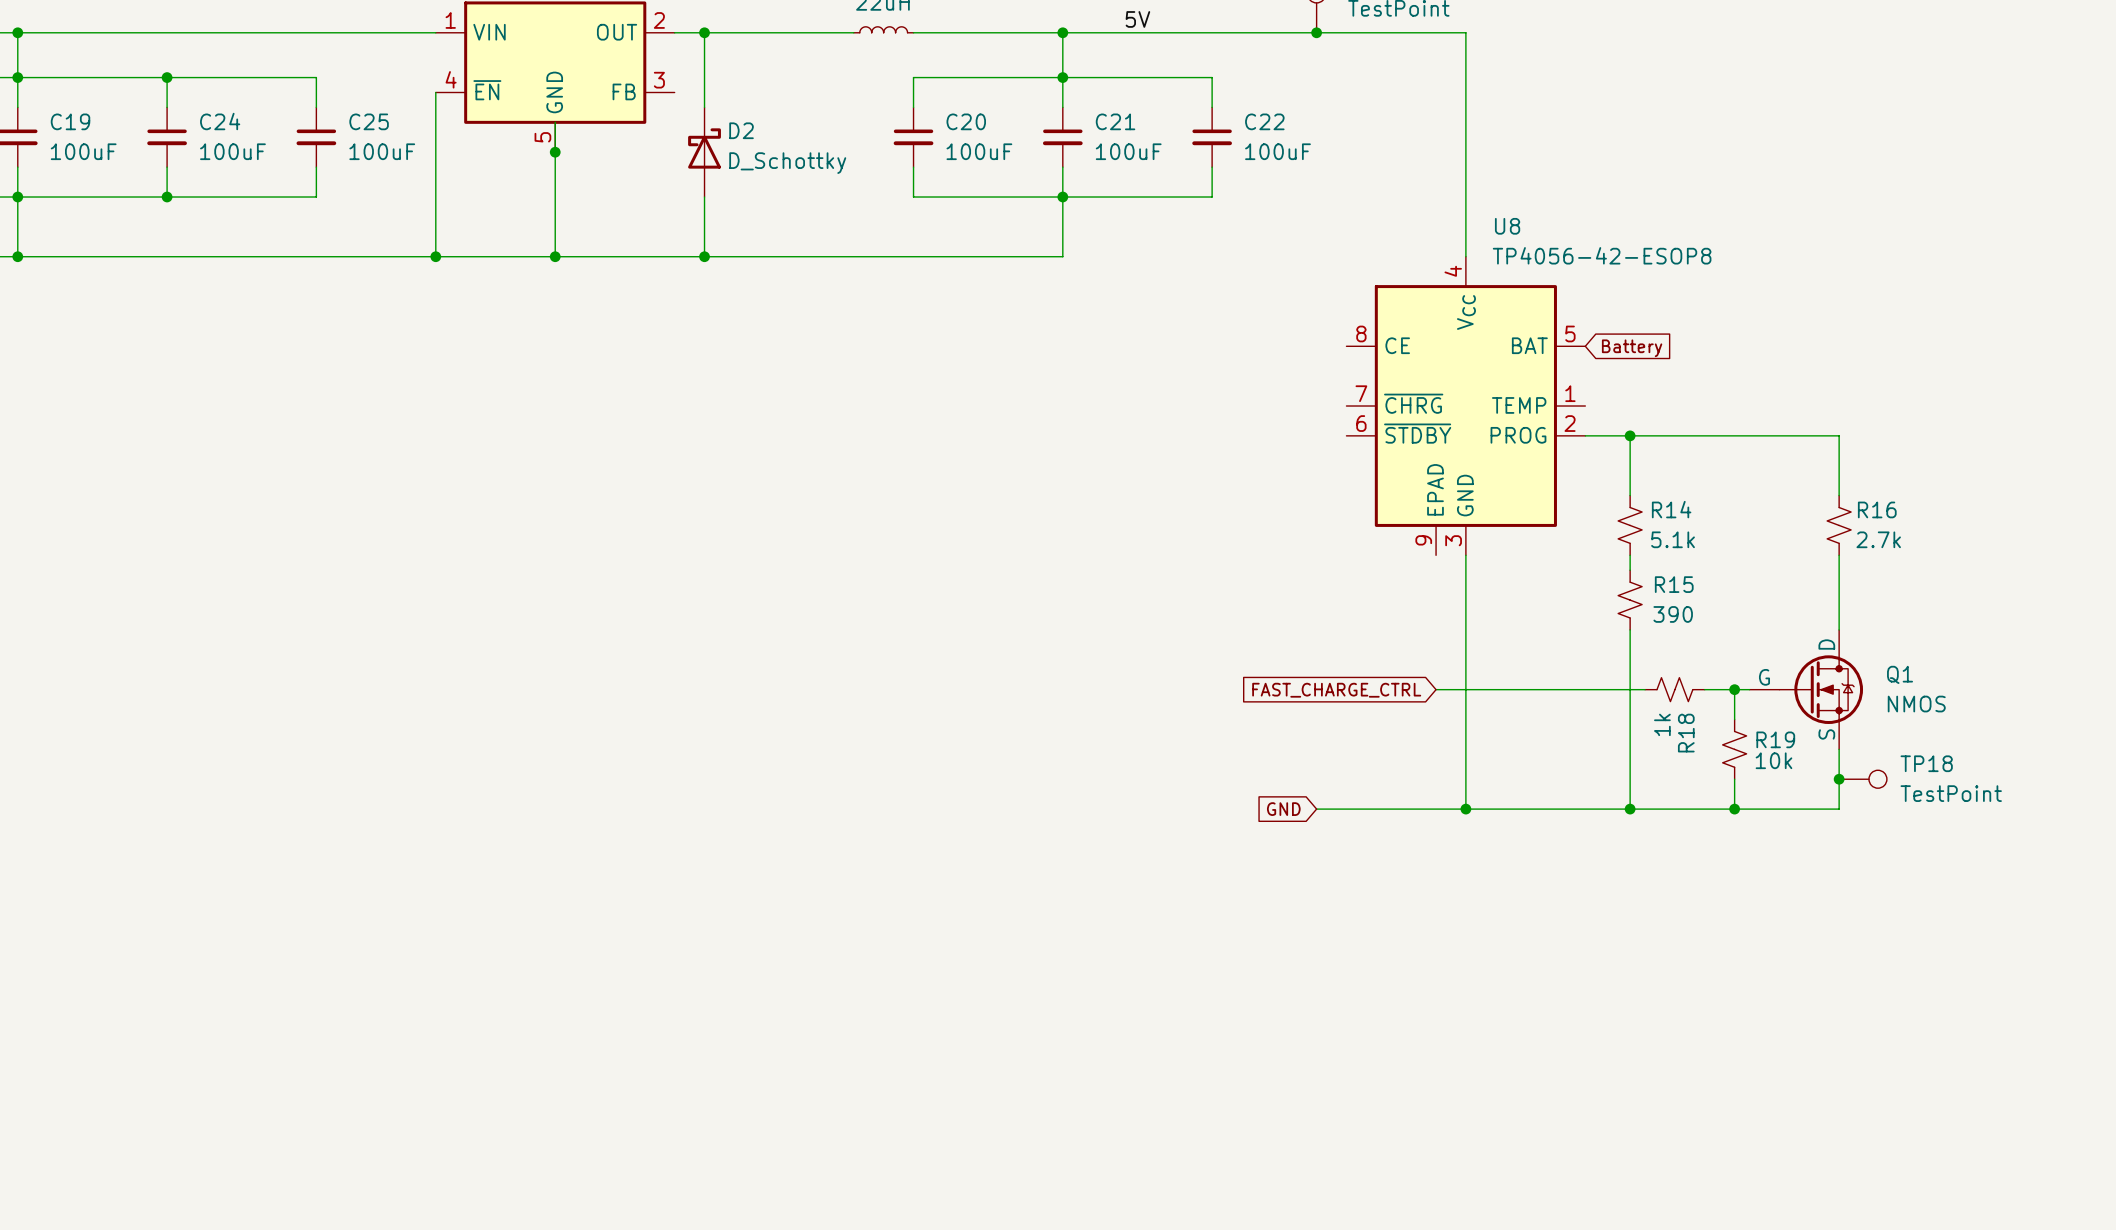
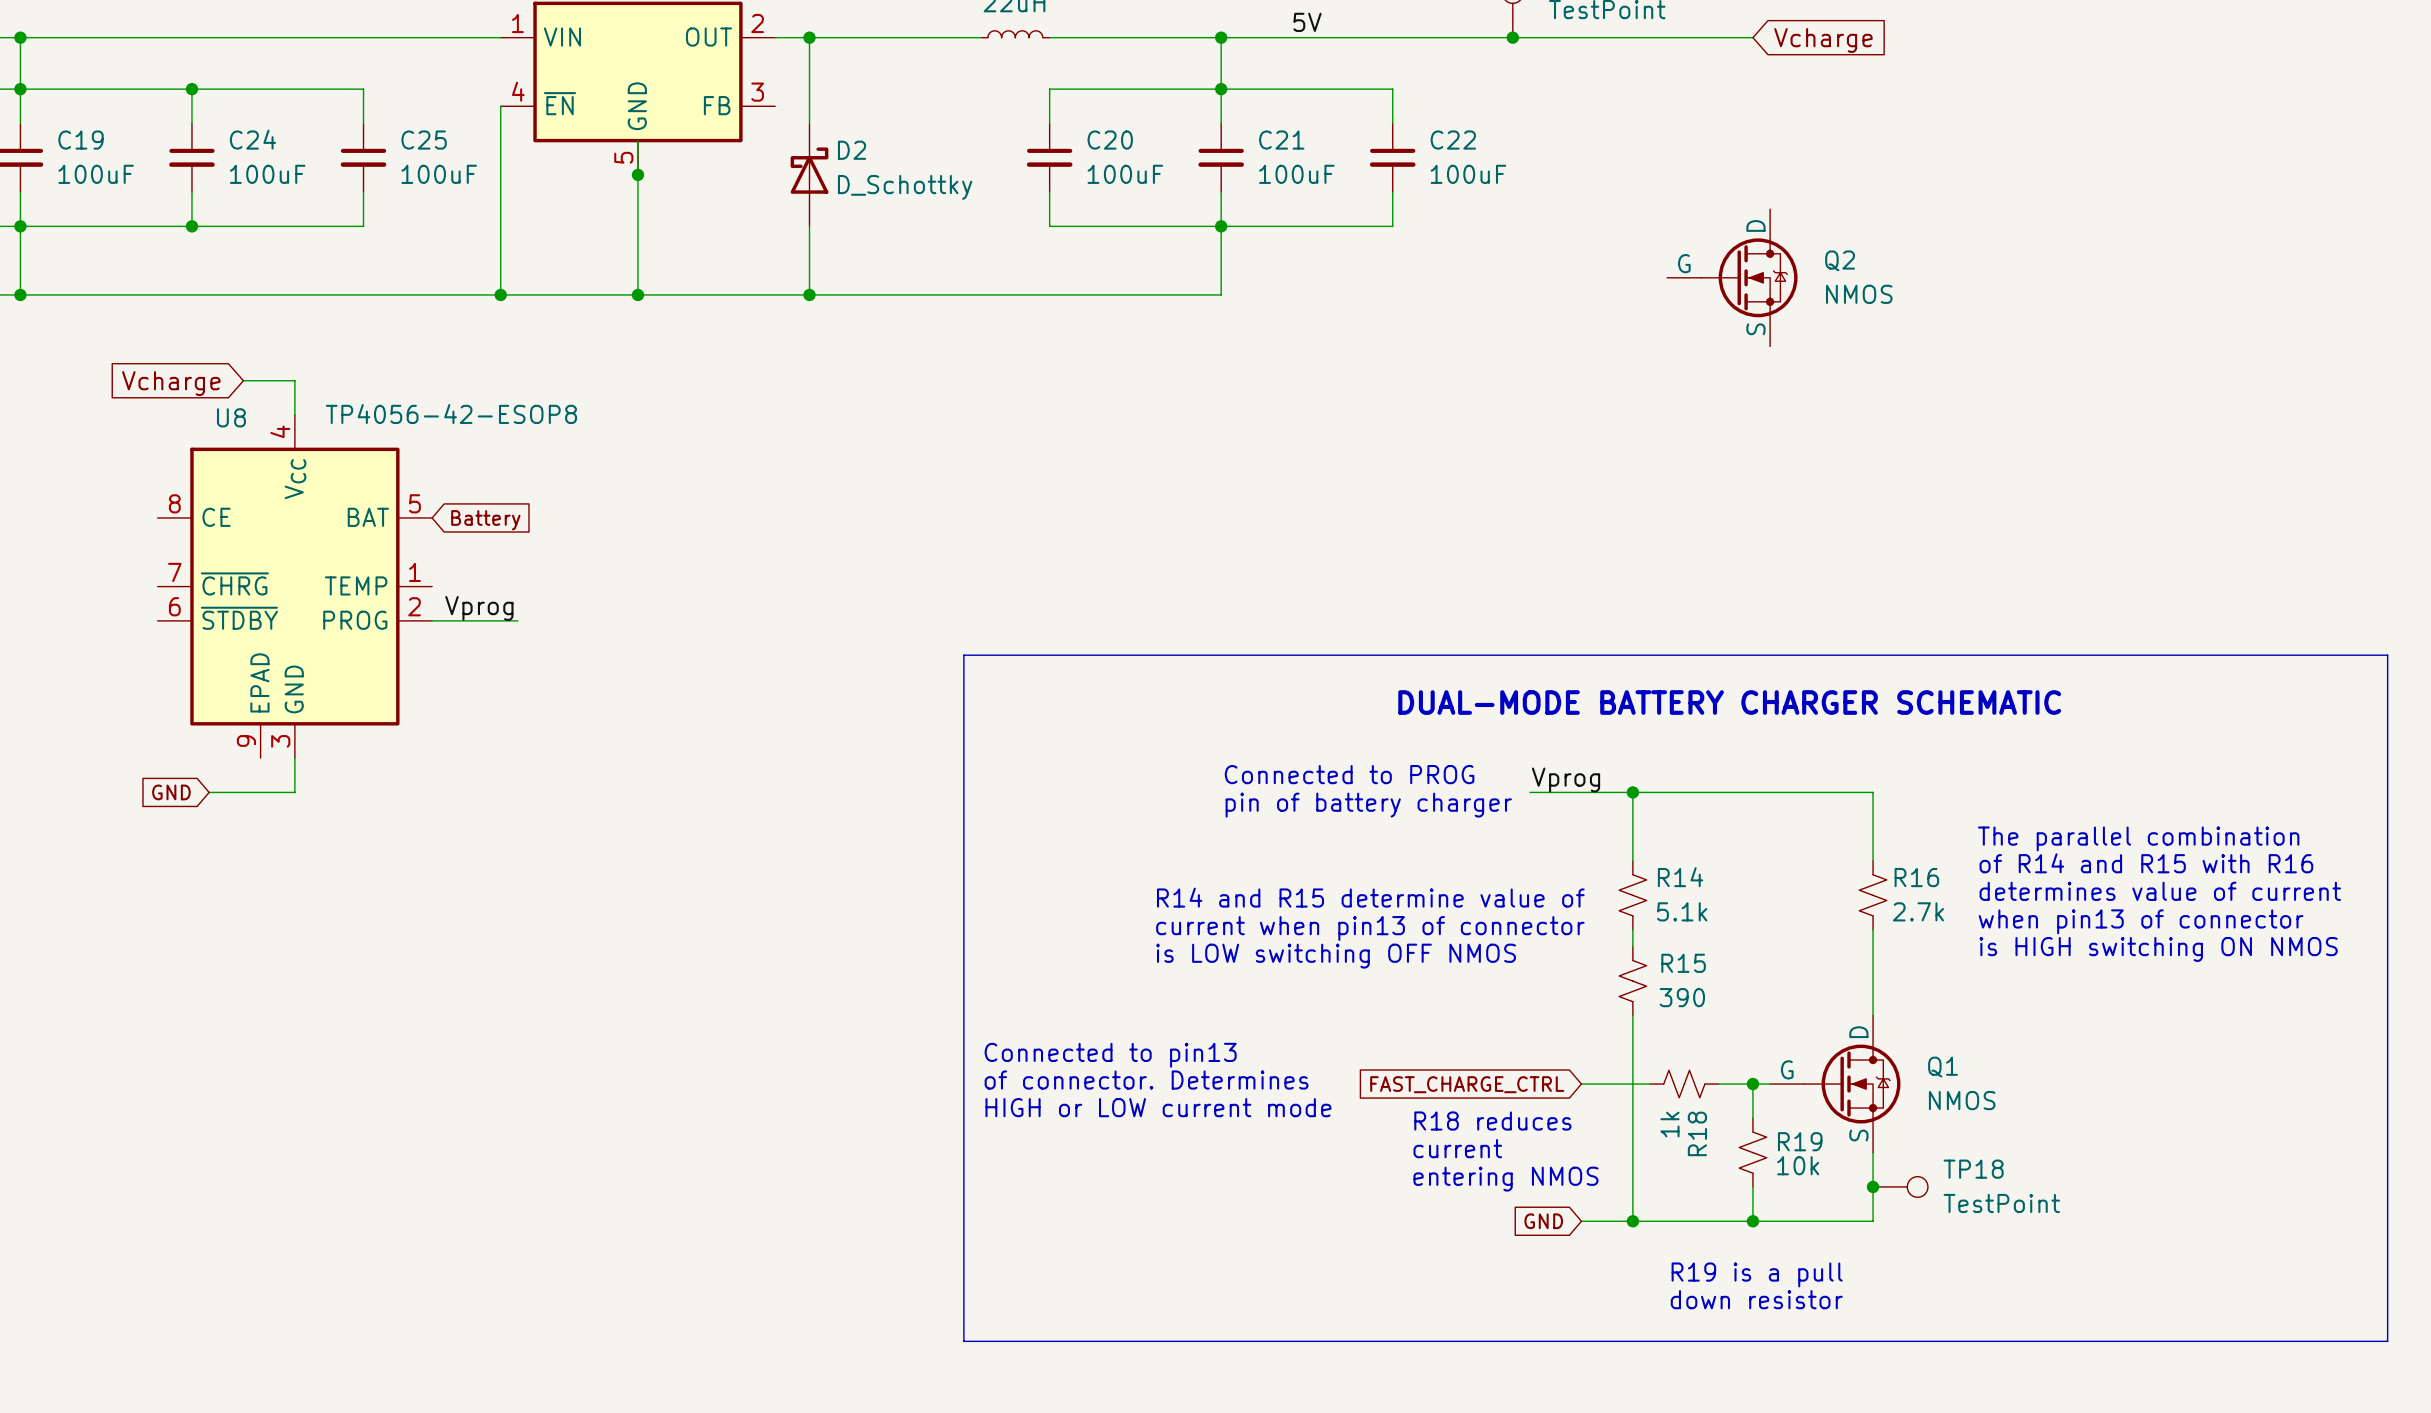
wire: (1465, 32) (1465, 256) -> (1684, 37) (1752, 37)
global label: none -> Vcharge (1823, 40)
U8 name position: U8 (1507, 226) -> U8 (231, 417)
Q2: none -> NMOS (1732, 277)
wire: none -> (243, 380) (294, 380) (294, 415)
global label: none -> Vcharge (171, 383)
global label: Battery (1632, 348) -> none
U8 position: (1465, 406) -> (294, 586)
wire: (1585, 435) (1839, 435) (1839, 495) -> none
wire: (1630, 435) (1630, 495) -> none
junction: (1630, 435) -> none
global label: none -> Battery (485, 520)
R14 position: (1630, 525) -> (1632, 895)
R16 position: (1839, 525) -> (1873, 895)
label: none -> Vprog (479, 608)
wire: none -> (432, 620) (517, 620)
wire: (1465, 555) (1465, 809) -> none
wire: (1630, 555) (1630, 570) -> none
wire: (1839, 555) (1839, 629) -> none
line: none -> (963, 655) (2387, 655) (2387, 1341) (963, 1341) (963, 655)
R15 position: (1630, 600) -> (1632, 981)
text: none -> DUAL-MODE BATTERY CHARGER SCHEMATIC (1729, 702)
wire: (1630, 629) (1630, 689) (1645, 689) -> none
wire: none -> (294, 758) (294, 792) (209, 792)
text: none -> Connected to PROG (1349, 774)
label: none -> Vprog (1566, 779)
global label: none -> GND (171, 792)
wire: none -> (1529, 792) (1650, 792)
wire: none -> (1632, 792) (1632, 861)
junction: none -> (1632, 792)
R18 position: (1674, 689) -> (1684, 1084)
wire: (1704, 689) (1749, 689) -> none
wire: (1734, 689) (1734, 719) -> none
junction: (1734, 689) -> none
Q1 position: (1806, 689) -> (1835, 1084)
global label position: FAST_CHARGE_CTRL (1336, 690) -> FAST_CHARGE_CTRL (1467, 1084)
text: none -> pin of battery charger (1368, 805)
text: none -> The parallel combination (2138, 838)
wire: (1630, 749) (1630, 809) -> (1873, 1015) (1873, 929)
R19 position: (1734, 749) -> (1752, 1152)
wire: (1839, 749) (1839, 809) (1316, 809) -> none
text: none -> of R14 and R15 with R16 (2146, 863)
text: none -> determines value of current (2160, 891)
wire: (1734, 779) (1734, 809) -> (1752, 1084) (1752, 1118)
junction: (1839, 779) -> none
TP18 position: (1863, 779) -> (1900, 1186)
text: none -> R14 and R15 determine value of (1370, 897)
text: none -> when pin13 of connector (2141, 921)
text: none -> current when pin13 of connector (1370, 928)
global label position: GND (1283, 809) -> GND (1543, 1221)
wire: none -> (1632, 929) (1632, 946)
junction: (1465, 809) -> none
junction: (1630, 809) -> none
junction: (1734, 809) -> none
text: none -> is HIGH switching ON NMOS (2158, 949)
text: none -> is LOW switching OFF NMOS (1336, 956)
wire: none -> (1632, 1015) (1632, 1221)
text: none -> Connected to pin13 (1110, 1055)
text: none -> of connector. Determines (1146, 1080)
wire: none -> (1581, 1084) (1650, 1084)
wire: none -> (1718, 1084) (1770, 1084)
junction: none -> (1752, 1084)
text: none -> HIGH or LOW current mode (1158, 1107)
text: none -> R18 reduces (1492, 1121)
text: none -> current (1457, 1148)
wire: none -> (1873, 1152) (1873, 1221) (1581, 1221)
text: none -> entering NMOS (1505, 1179)
wire: none -> (1752, 1186) (1752, 1221)
junction: none -> (1873, 1186)
junction: none -> (1632, 1221)
junction: none -> (1752, 1221)
text: none -> R19 is a pull (1757, 1274)
text: none -> down resistor (1756, 1299)

